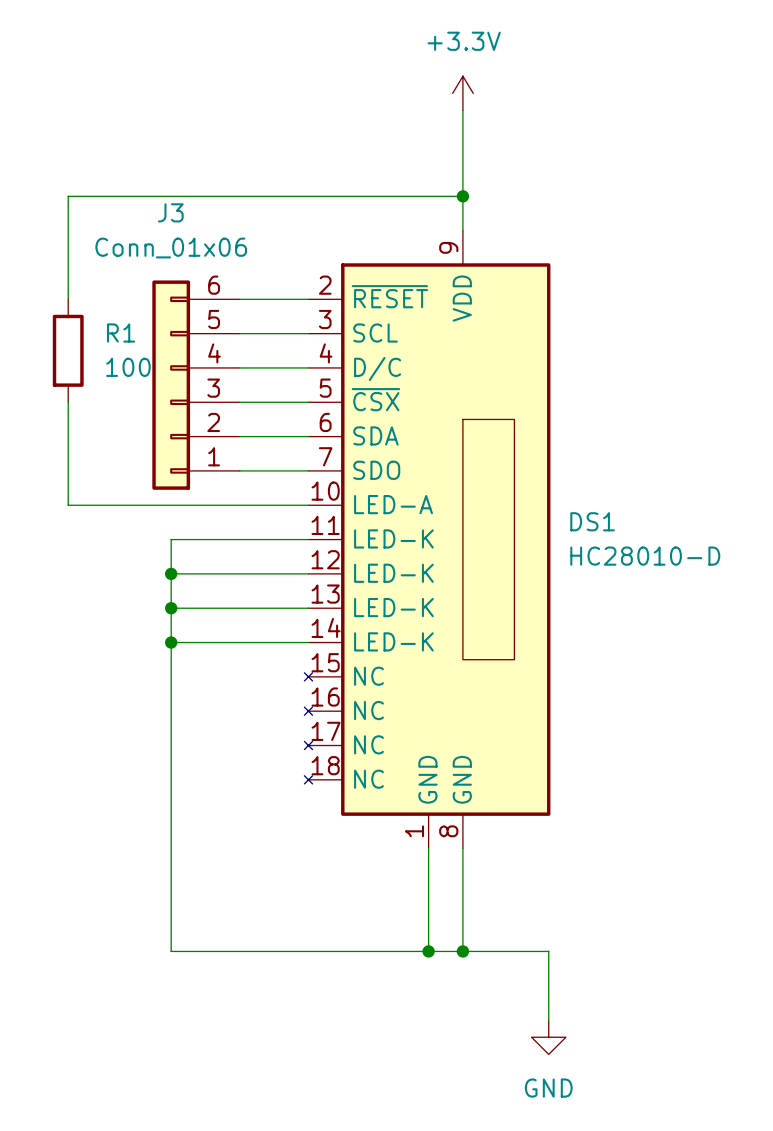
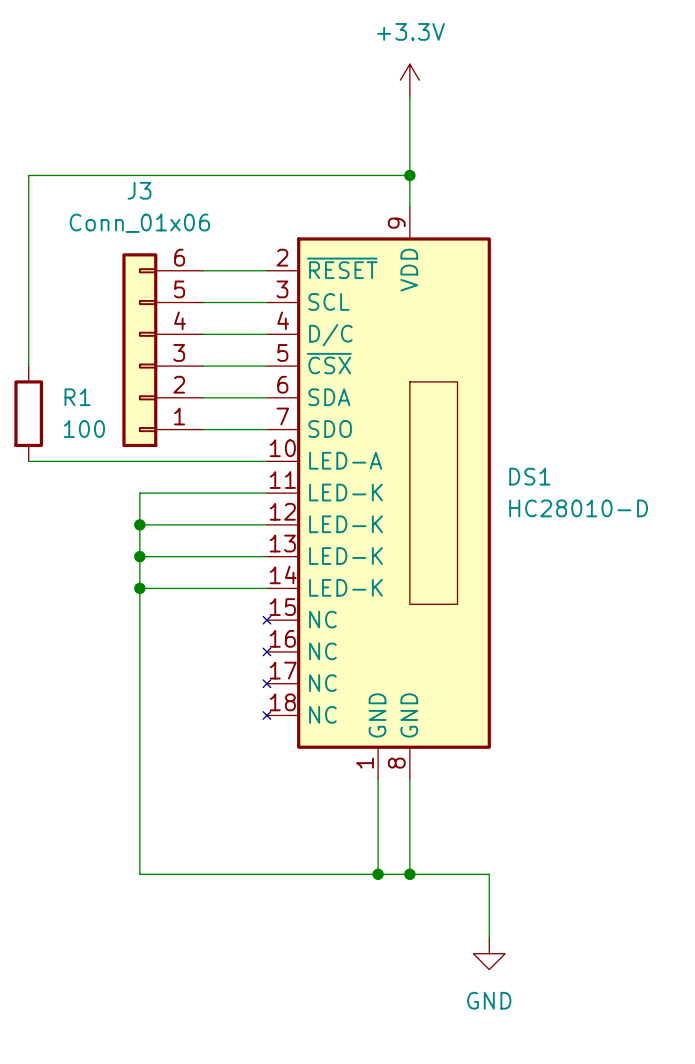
wire: (68, 196) (68, 299) -> (44, 175) (28, 175) (28, 366)
R1 position: (68, 350) -> (28, 413)
wire: (68, 402) (68, 505) -> (28, 461) (44, 461)

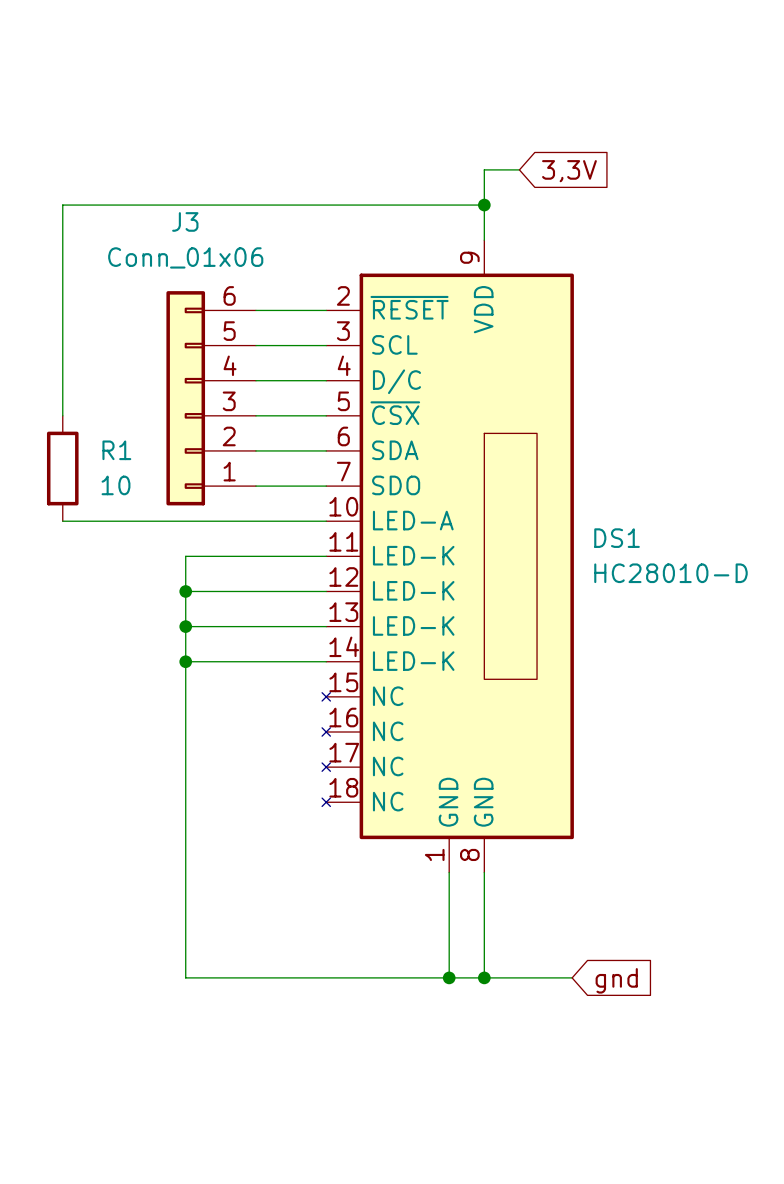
power symbol: +3.3V (409, 80) -> none
wire: (409, 96) (409, 143) -> (519, 169) (484, 169)
global label: none -> 3,3V (569, 171)
R1 value: 100 (84, 428) -> 10 (116, 485)
wire: (489, 874) (489, 937) -> none
global label: none -> gnd (616, 980)
power symbol: GND (489, 953) -> none

